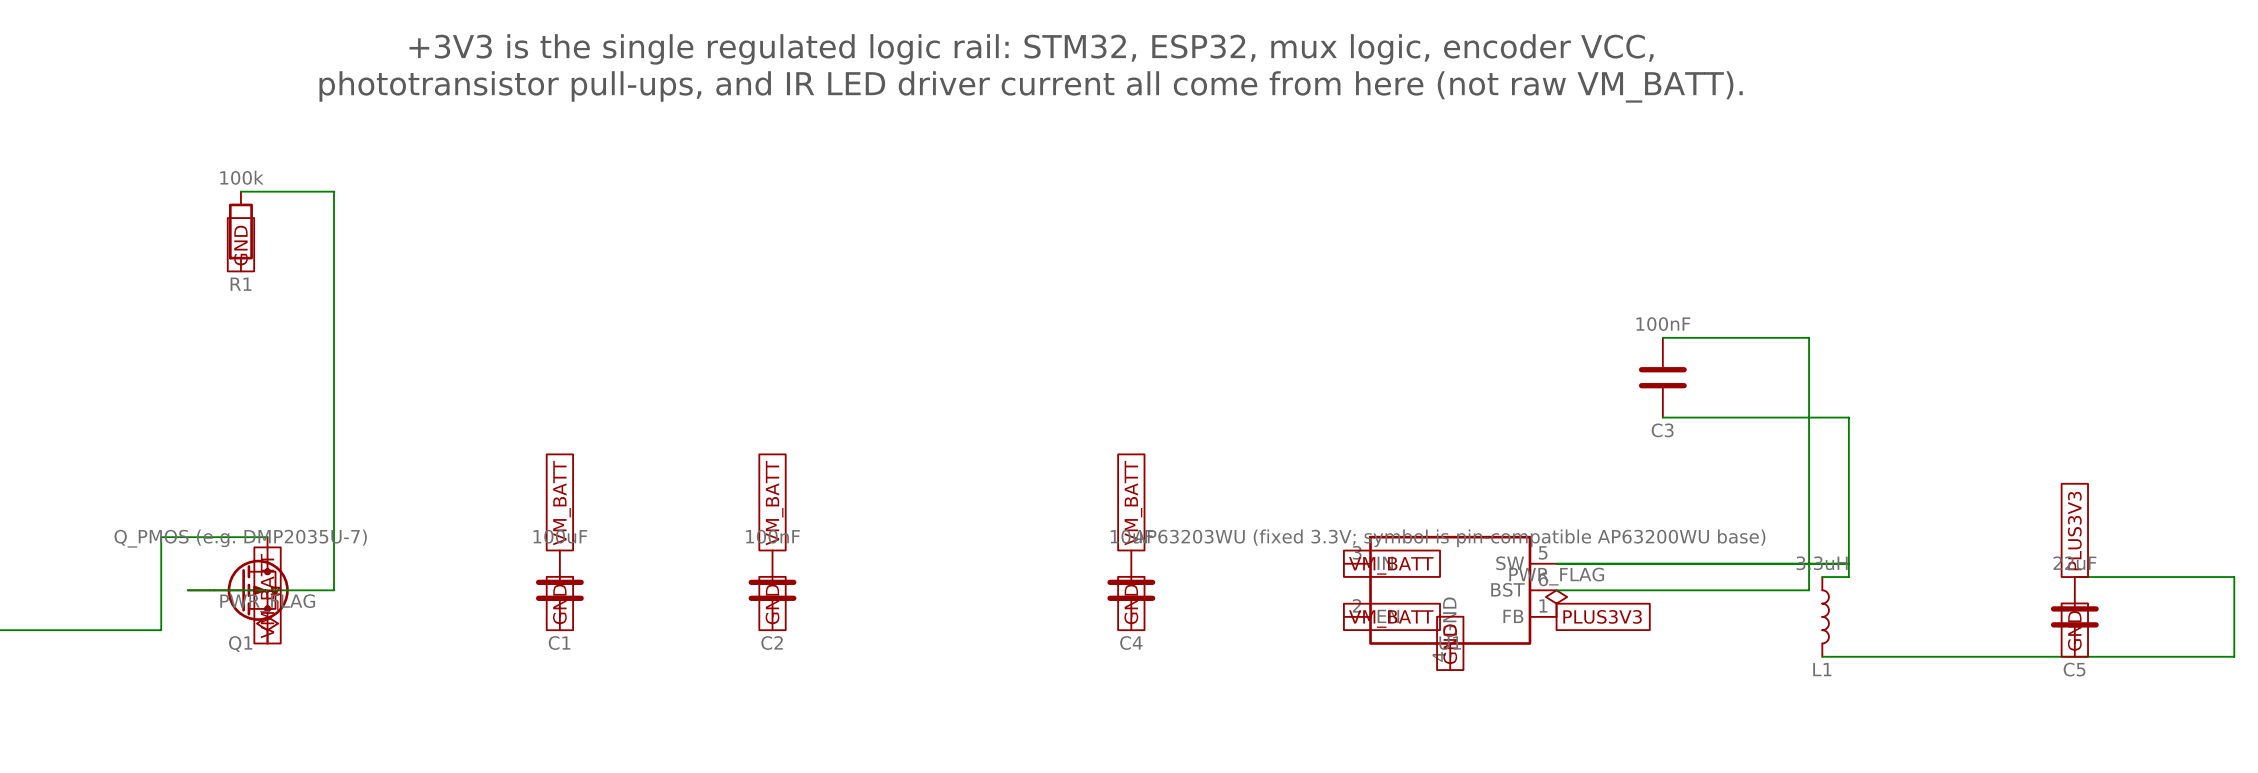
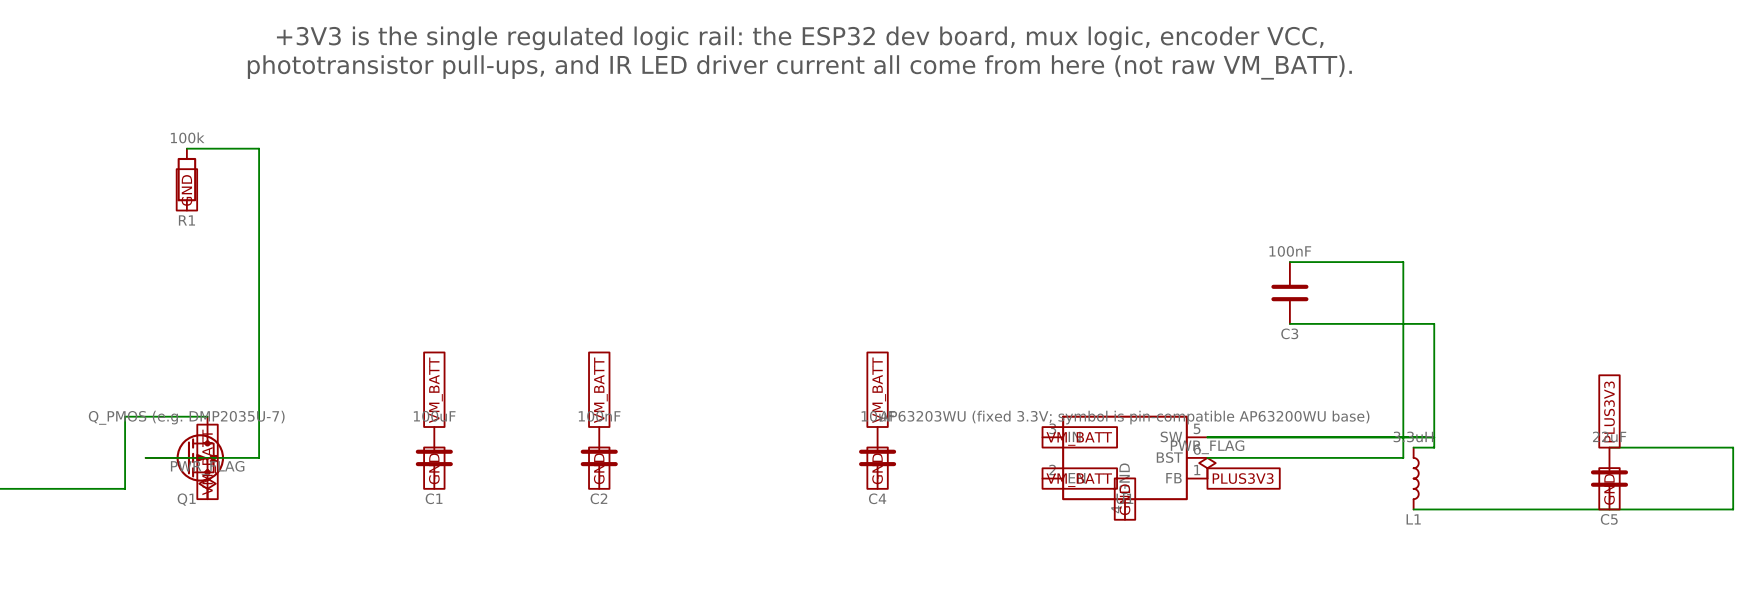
text: +3V3 is the single regulated logic rail: STM32, ESP32, mux logic, encoder VCC, (1031, 49) -> +3V3 is the single regulated logic rail: the ESP32 dev board, mux logic, encoder VCC, (800, 38)

